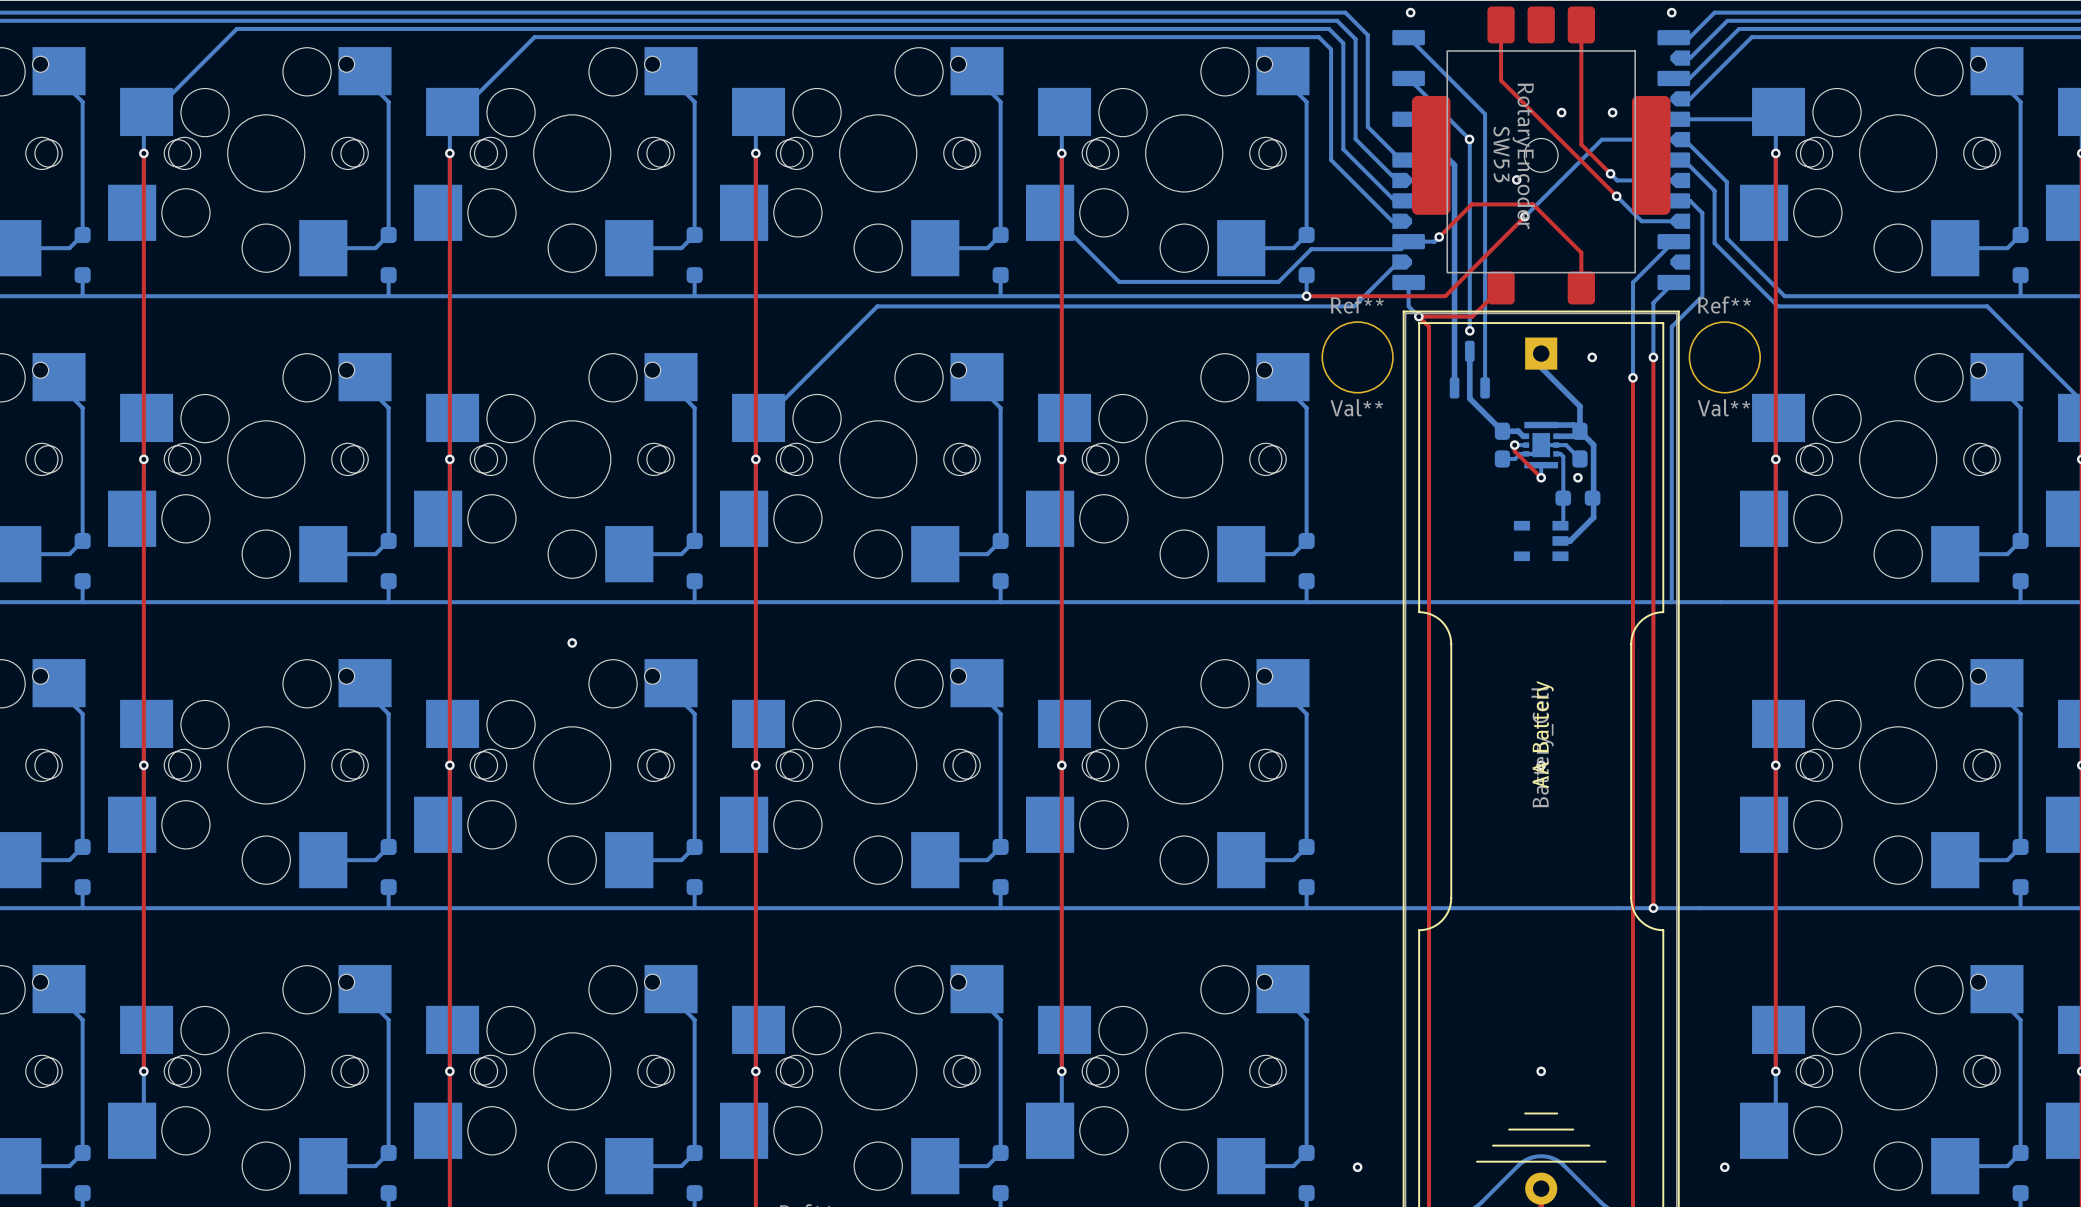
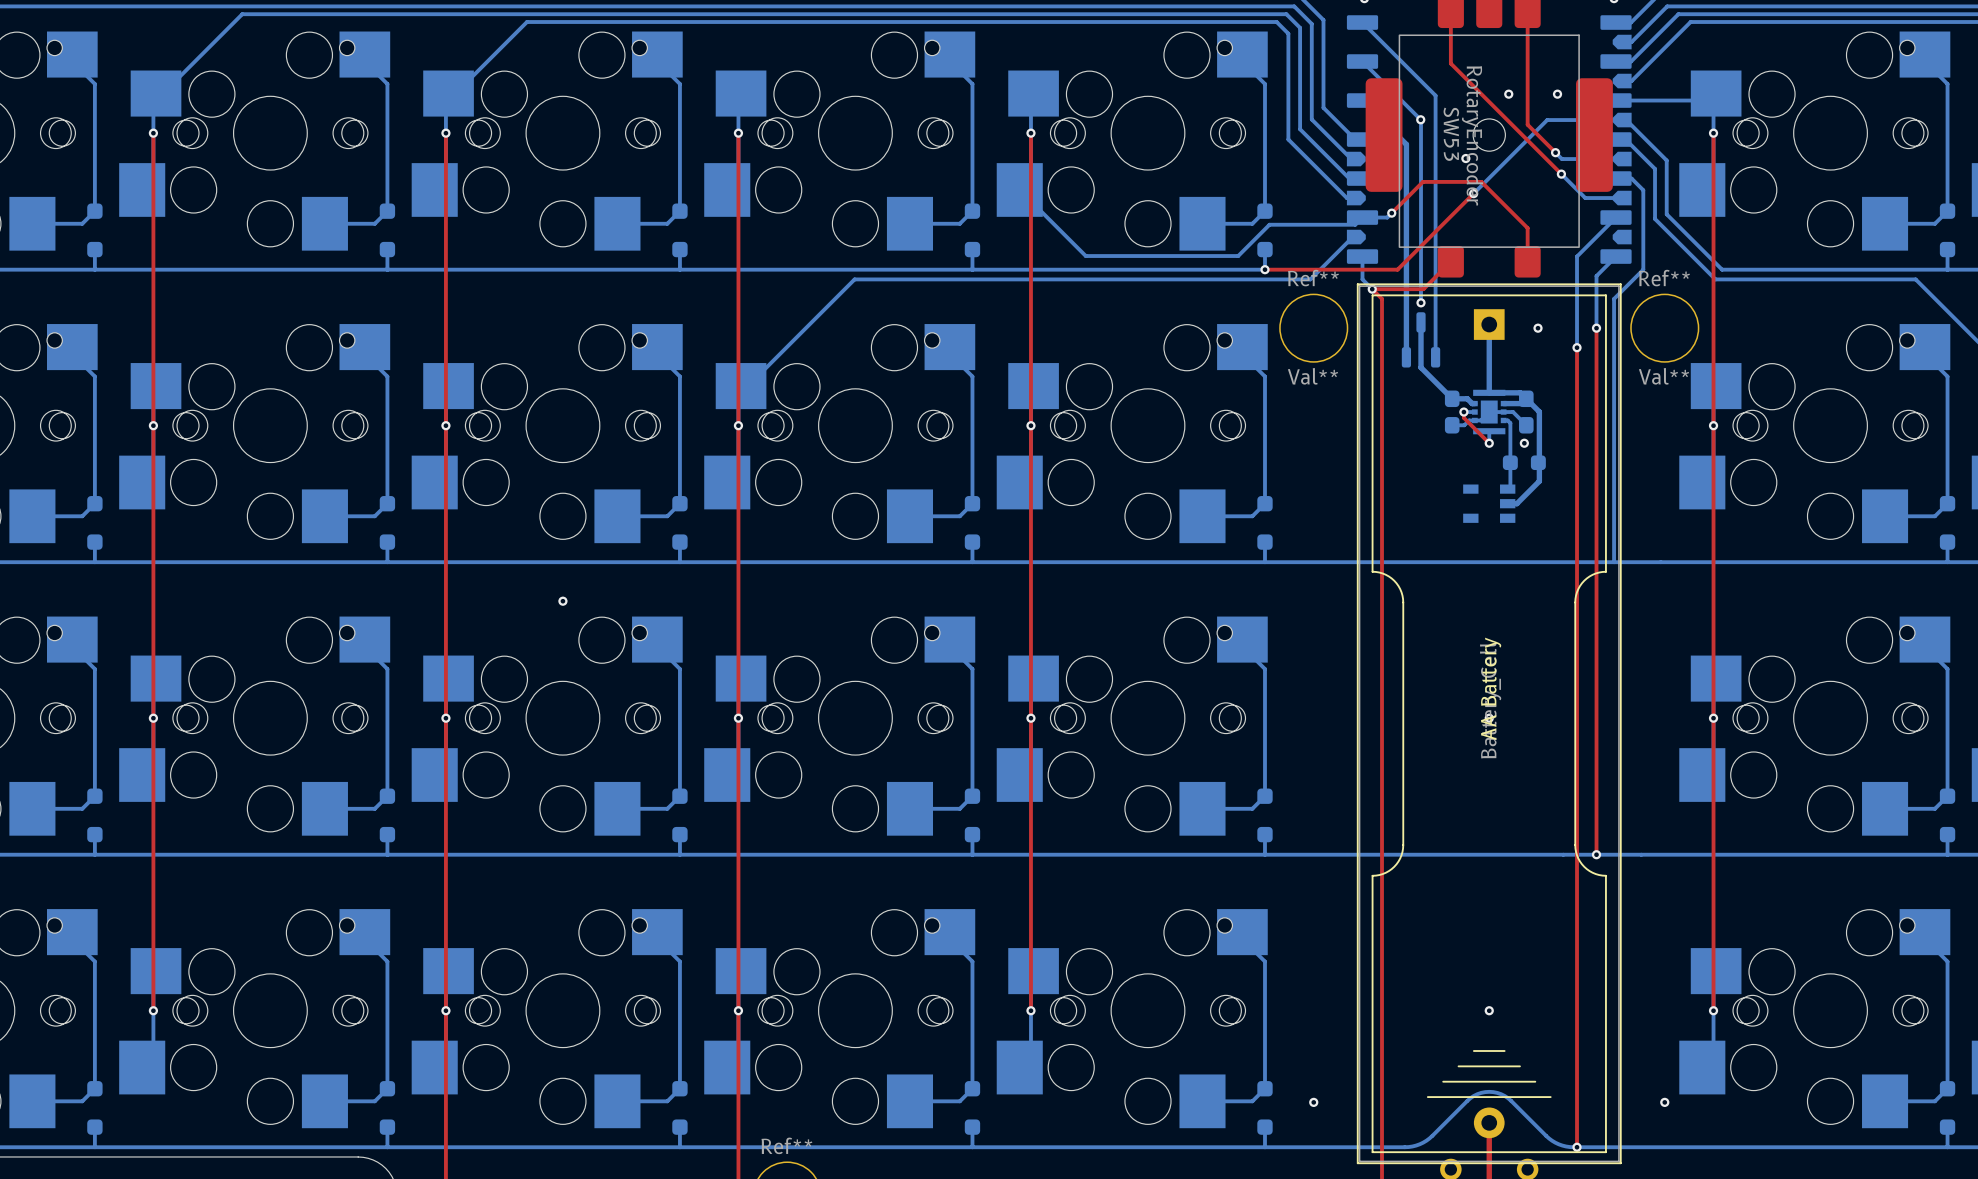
bottom track: (1541, 367) (1579, 406) (1579, 431) -> (1489, 337) (1489, 392)

